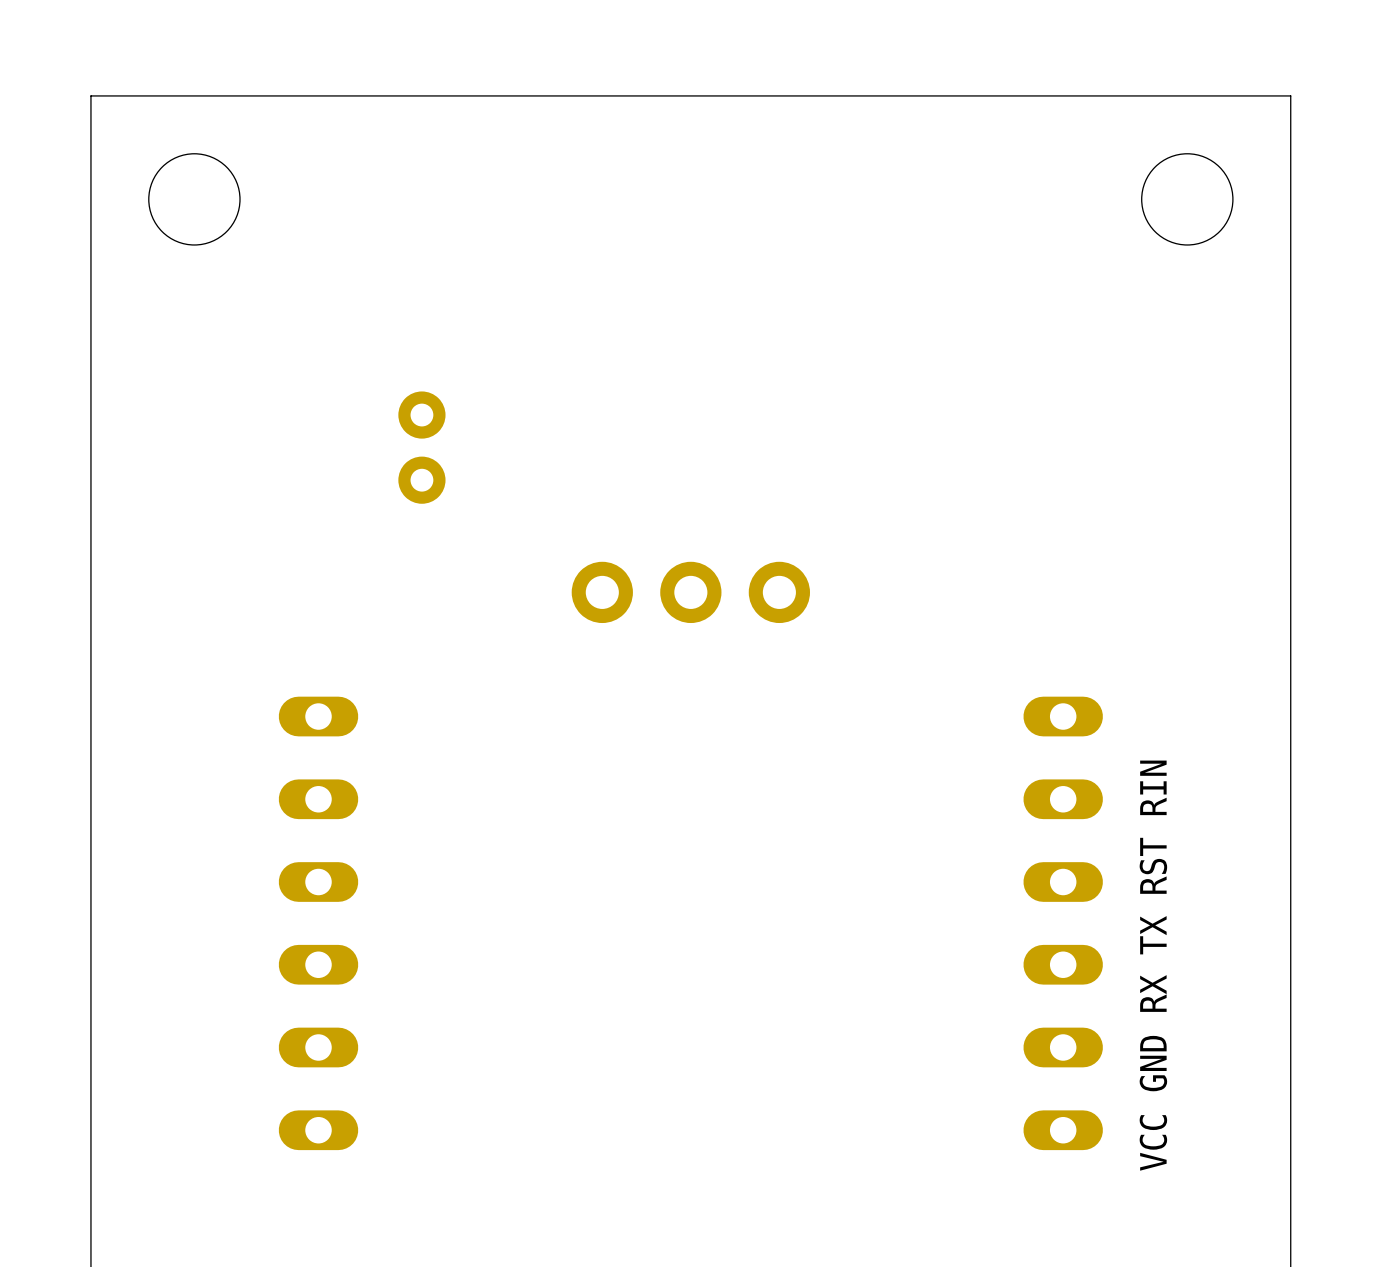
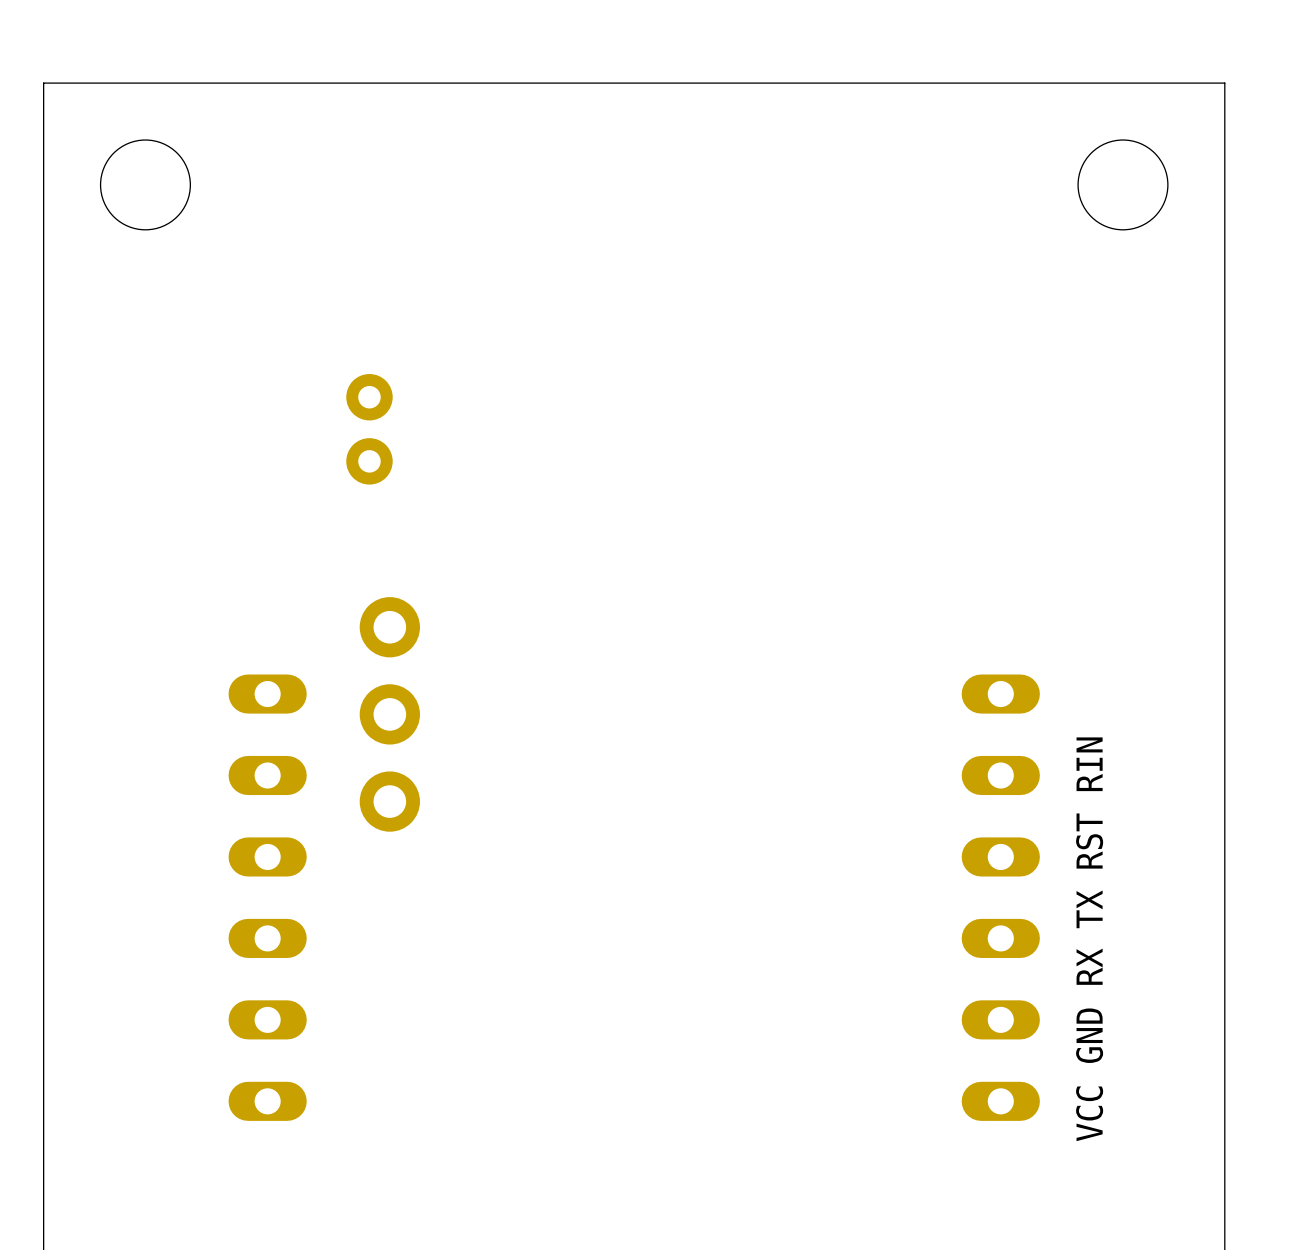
part rotation: 0° (690, 592) -> 90° clockwise (389, 714)
part position: (690, 592) -> (389, 714)

